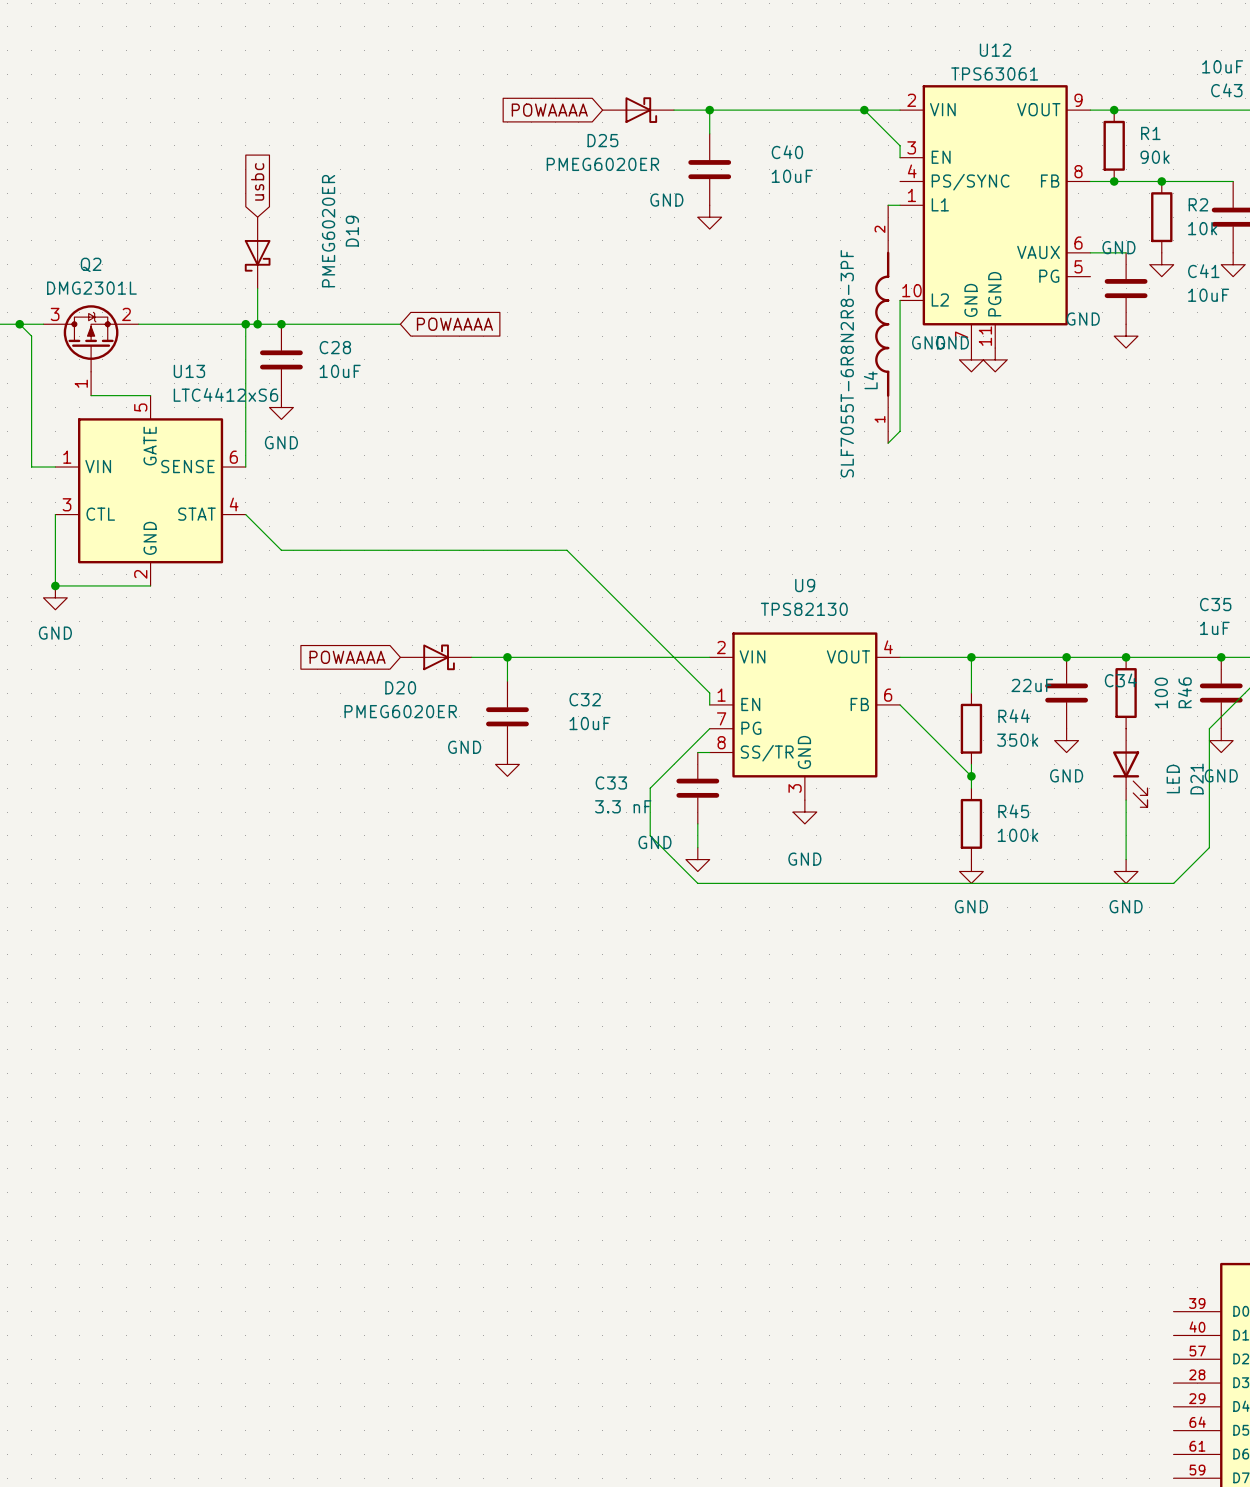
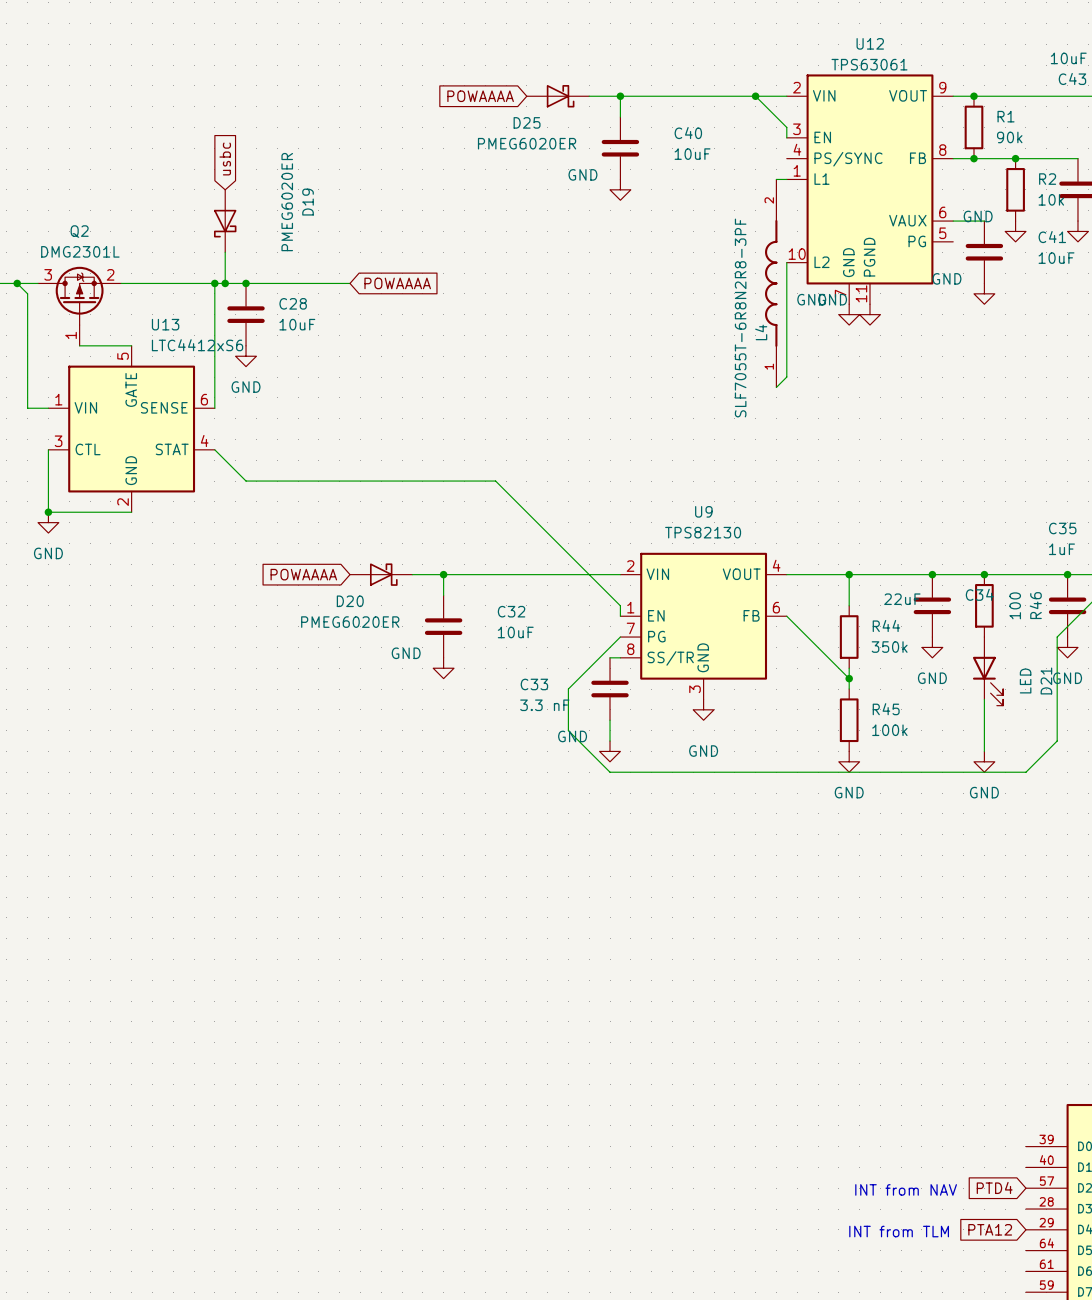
global label: none -> PTD4 (994, 1187)
text: none -> INT from NAV (906, 1189)
global label: none -> PTA12 (990, 1229)
text: none -> INT from TLM (899, 1231)

